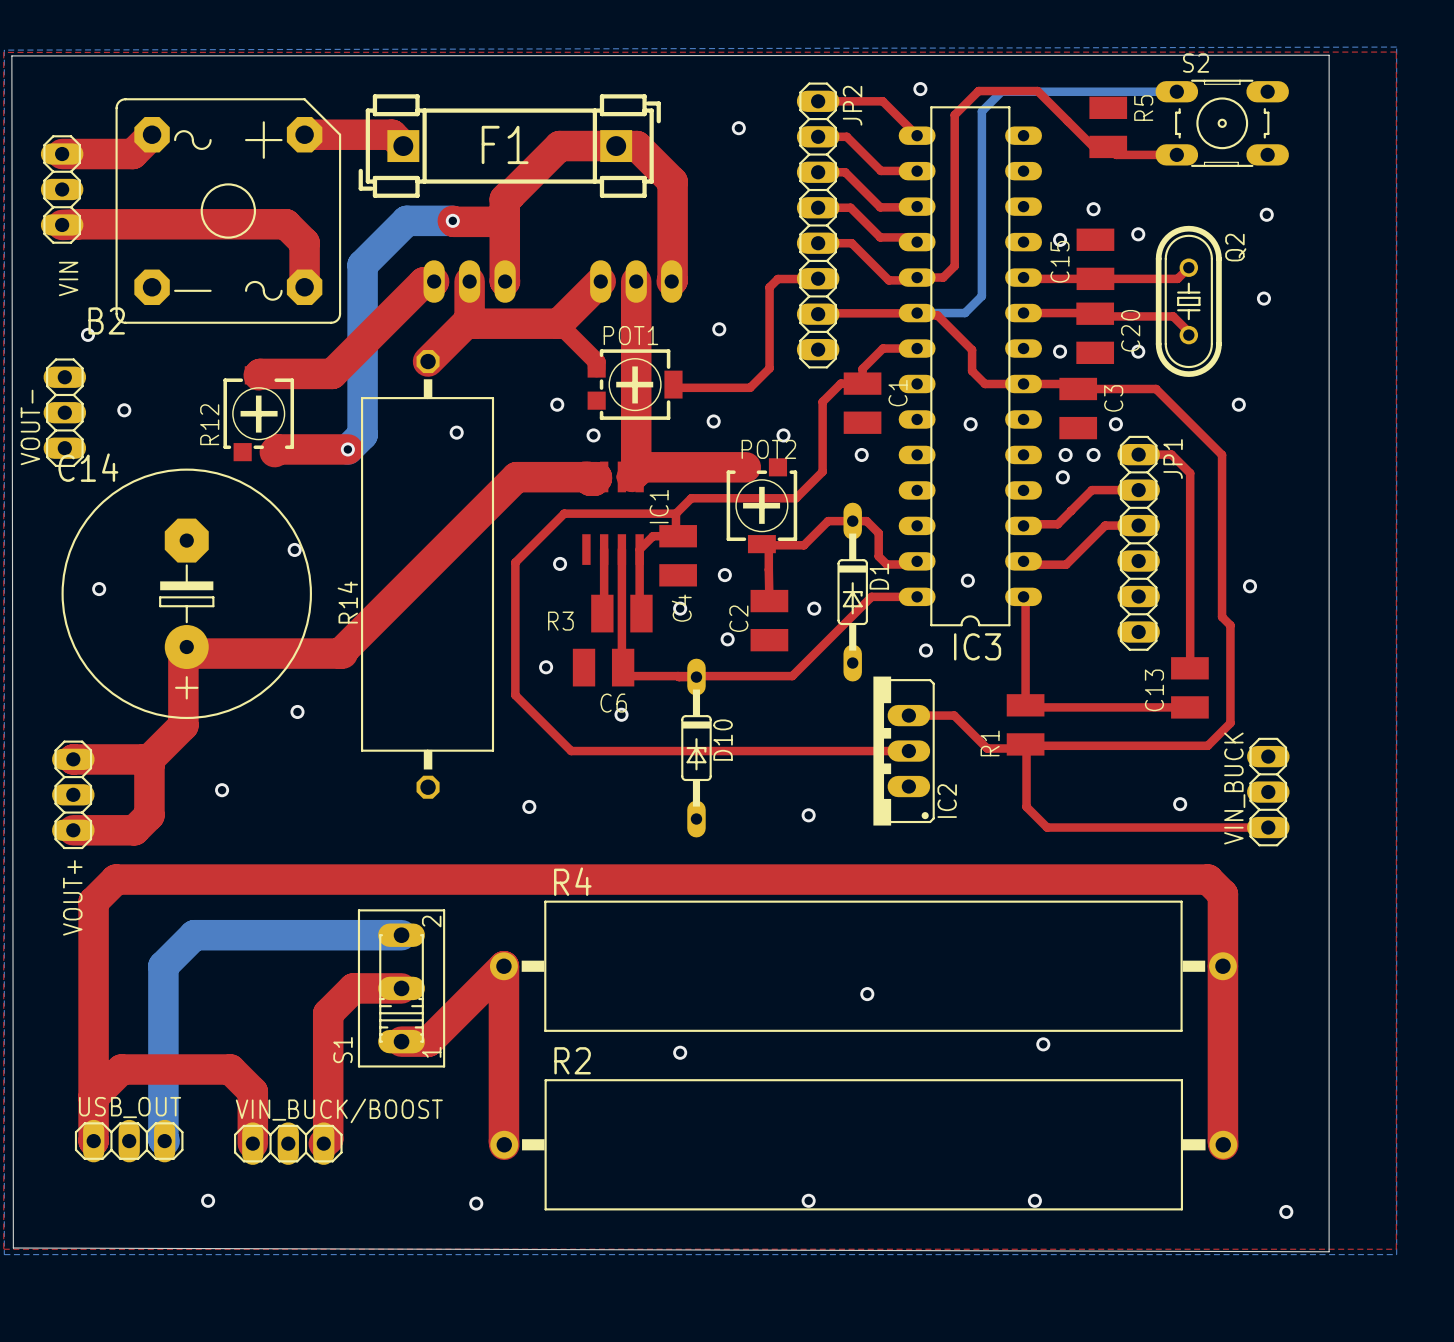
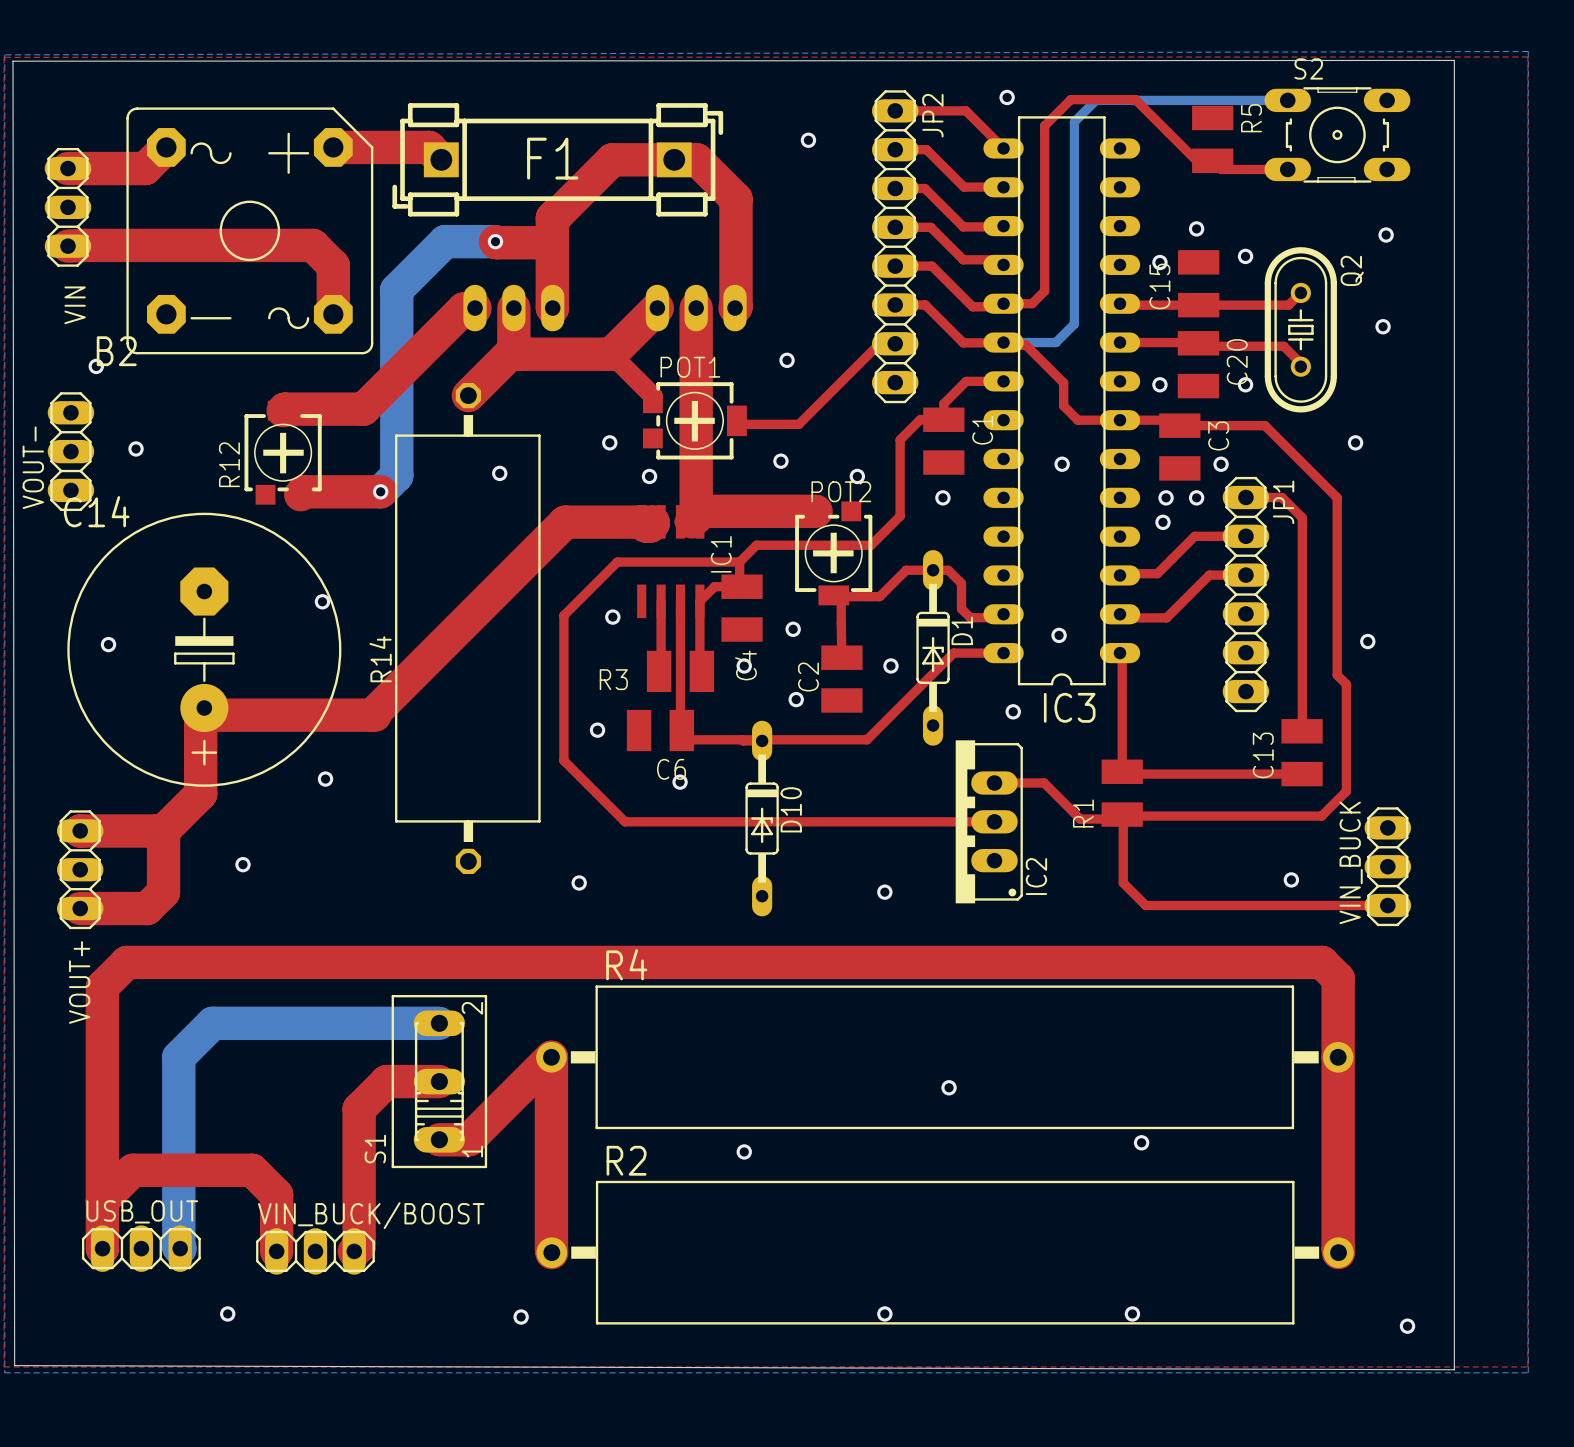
top track: (818, 278) (777, 279) (769, 287) (769, 368) (750, 387) (730, 387) -> (895, 343) (879, 343) (798, 424)
top track: (880, 313) (818, 314) -> (963, 342) (925, 304) (895, 304)

